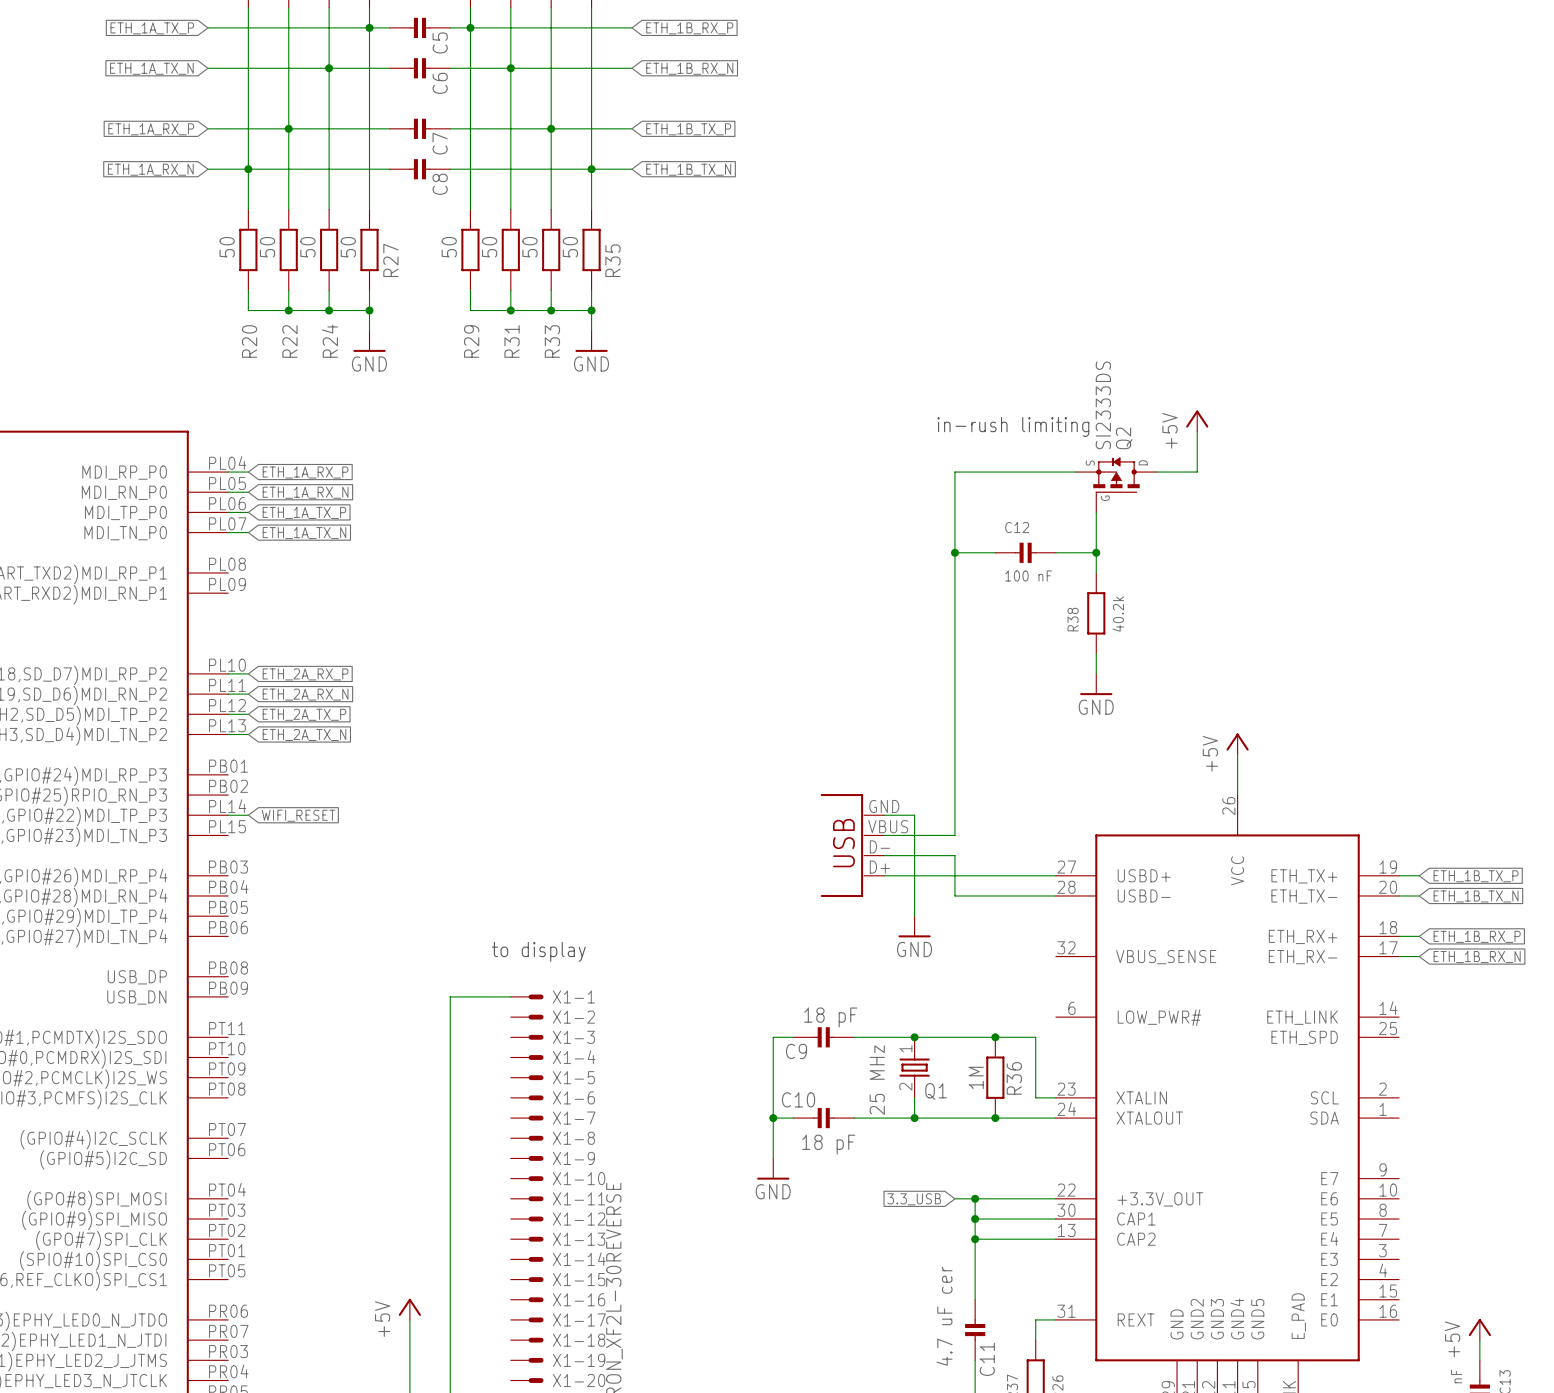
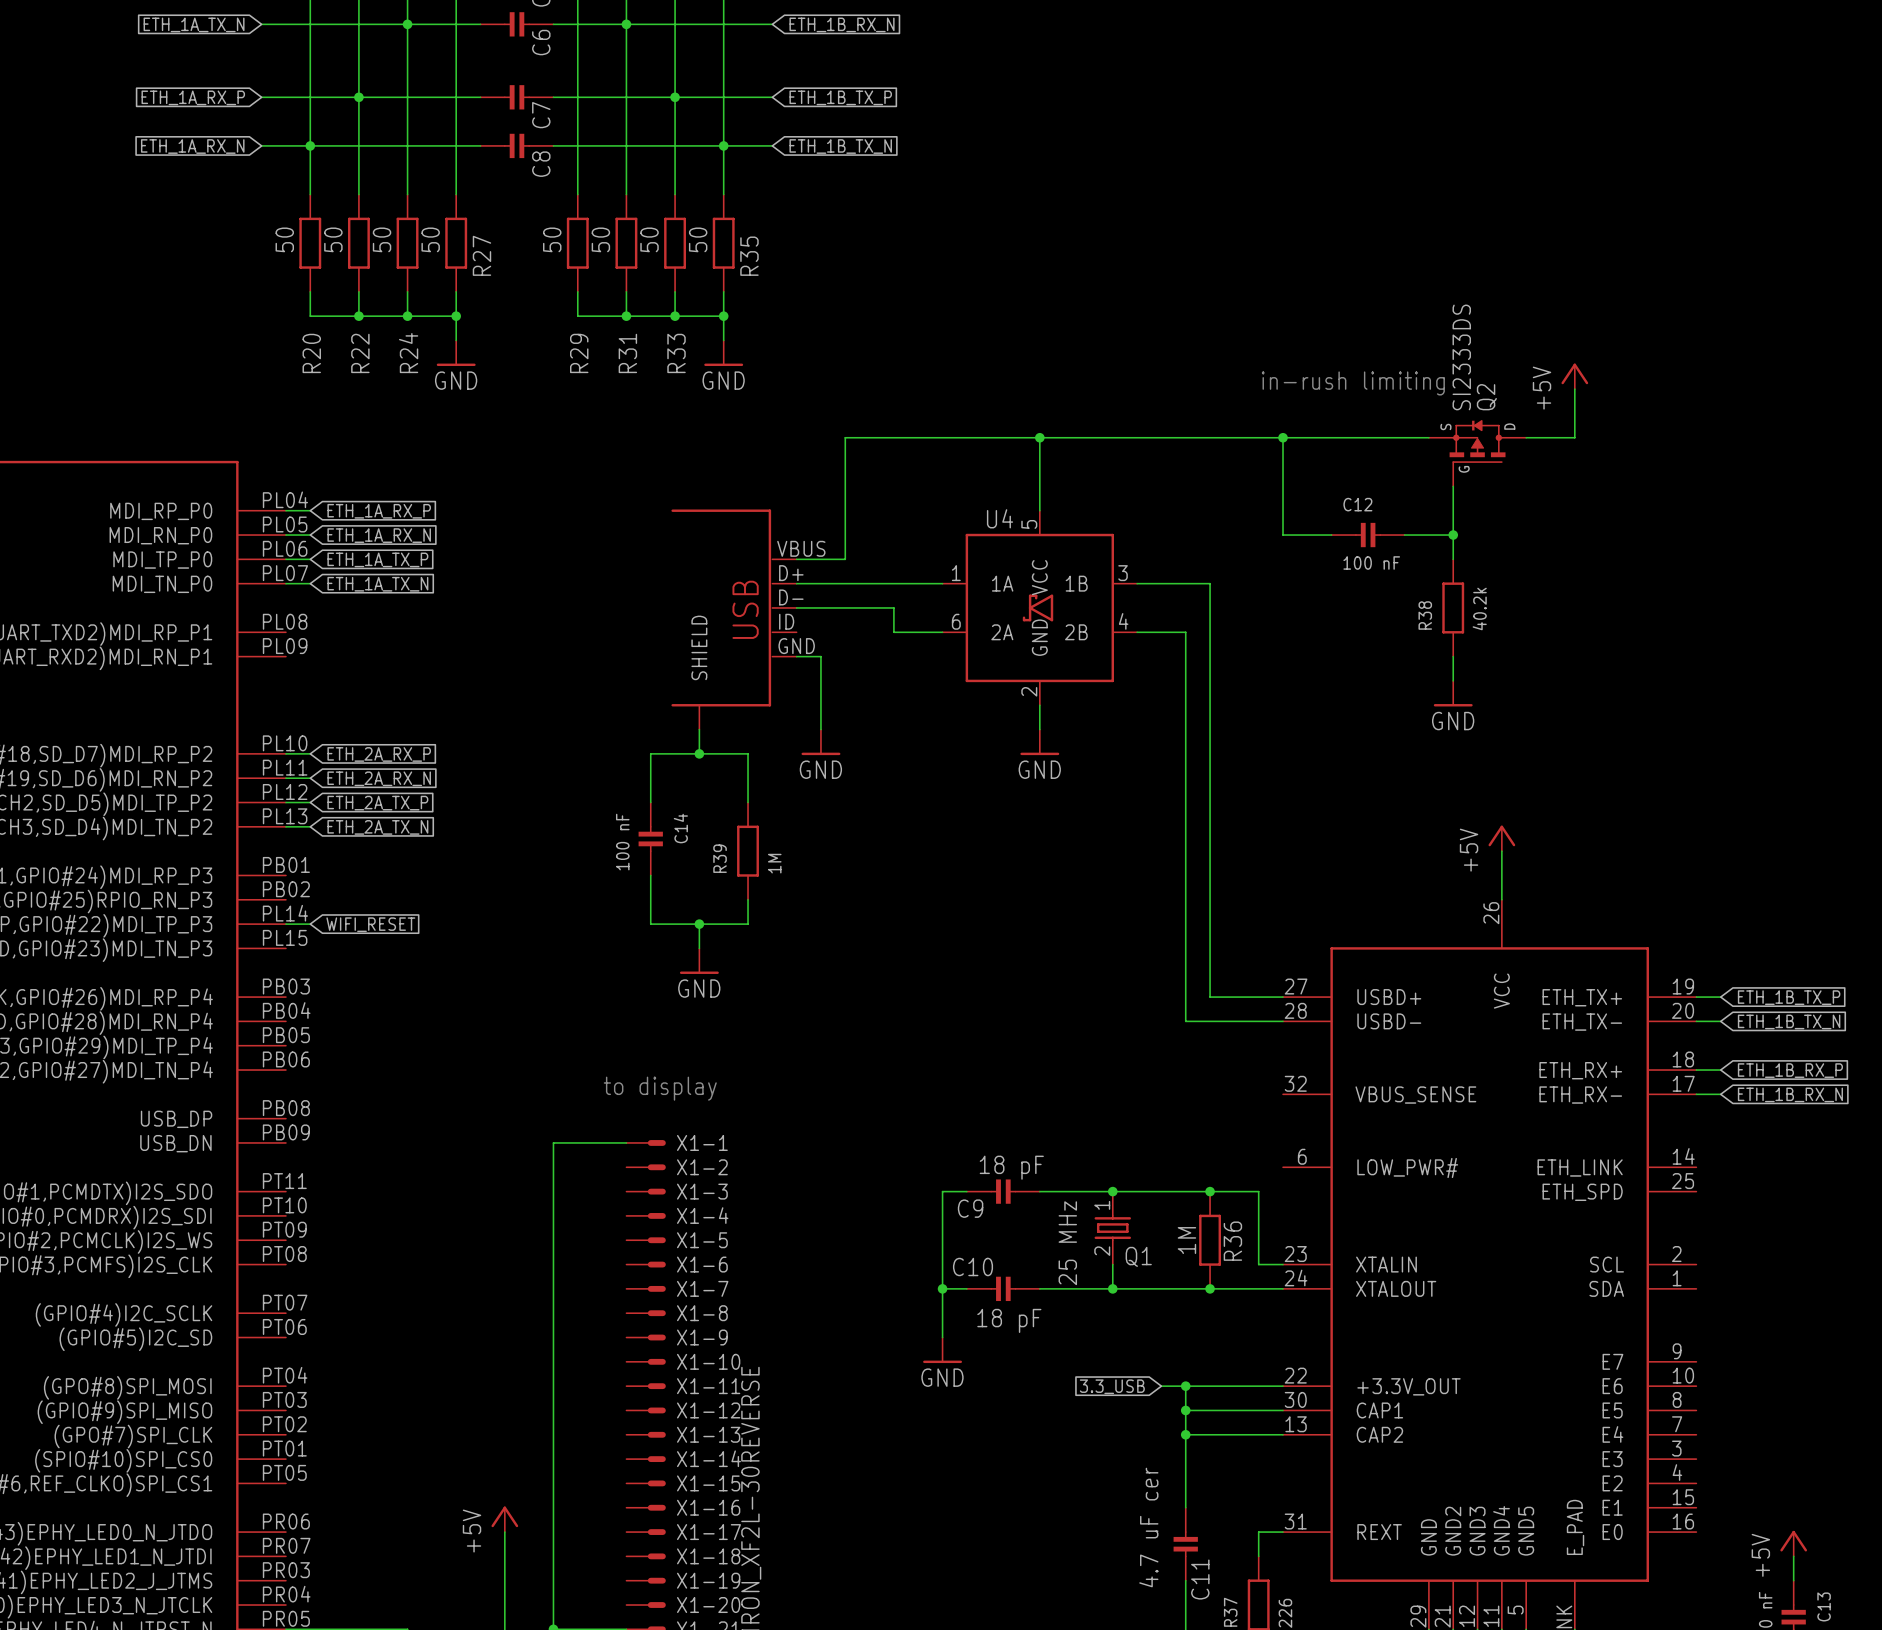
wire: none -> (1574, 389) (1574, 437) (1526, 437)
wire: none -> (1039, 437) (1039, 510)
junction: none -> (1039, 437)
wire: none -> (1283, 437) (1283, 535) (1331, 535)
junction: none -> (1283, 437)
wire: none -> (1428, 437) (845, 437) (845, 559) (796, 559)
power symbol position: +5V (1197, 421) -> +5V (1574, 376)
text position: in-rush limiting (1013, 426) -> in-rush limiting (1353, 383)
wire: (1076, 472) (954, 472) (954, 835) (884, 835) -> none
wire: (1156, 472) (1197, 472) -> (1453, 559) (1453, 510)
Q2 position: (1116, 484) -> (1477, 453)
junction: none -> (1453, 535)
wire: (1096, 512) (1096, 572) -> none
wire: none -> (796, 583) (942, 583)
wire: none -> (796, 607) (893, 607) (893, 632) (942, 632)
U4: none -> (1039, 607)
wire: (954, 552) (995, 552) -> none
junction: (954, 552) -> none
C12 position: (1025, 552) -> (1368, 535)
wire: (1055, 552) (1096, 552) -> (1404, 535) (1453, 535)
junction: (1096, 552) -> none
part: none -> (734, 619)
wire: none -> (796, 656) (820, 656) (820, 729)
R38 position: (1096, 613) -> (1453, 607)
wire: none -> (1039, 705) (1039, 729)
wire: none -> (699, 729) (699, 753)
wire: (1096, 653) (1096, 673) -> (1453, 656) (1453, 680)
power symbol: none -> GND (820, 742)
power symbol: none -> GND (1039, 742)
junction: none -> (699, 753)
power symbol position: GND (1096, 684) -> GND (1453, 693)
wire: none -> (650, 802) (650, 753) (748, 753) (748, 802)
C14: none -> 100 nF (650, 838)
R39: none -> 1M (748, 851)
wire: none -> (650, 875) (650, 924) (748, 924) (748, 899)
wire: none -> (699, 924) (699, 948)
junction: none -> (699, 924)
wire: (884, 815) (914, 815) (914, 916) -> none
part: (852, 845) -> none
power symbol: none -> GND (699, 961)
wire: (884, 855) (954, 855) (954, 895) (975, 895) -> (1137, 632) (1185, 632) (1185, 1021)
wire: (884, 875) (995, 875) -> (1137, 583) (1210, 583) (1210, 997)
power symbol: GND (914, 926) -> none

